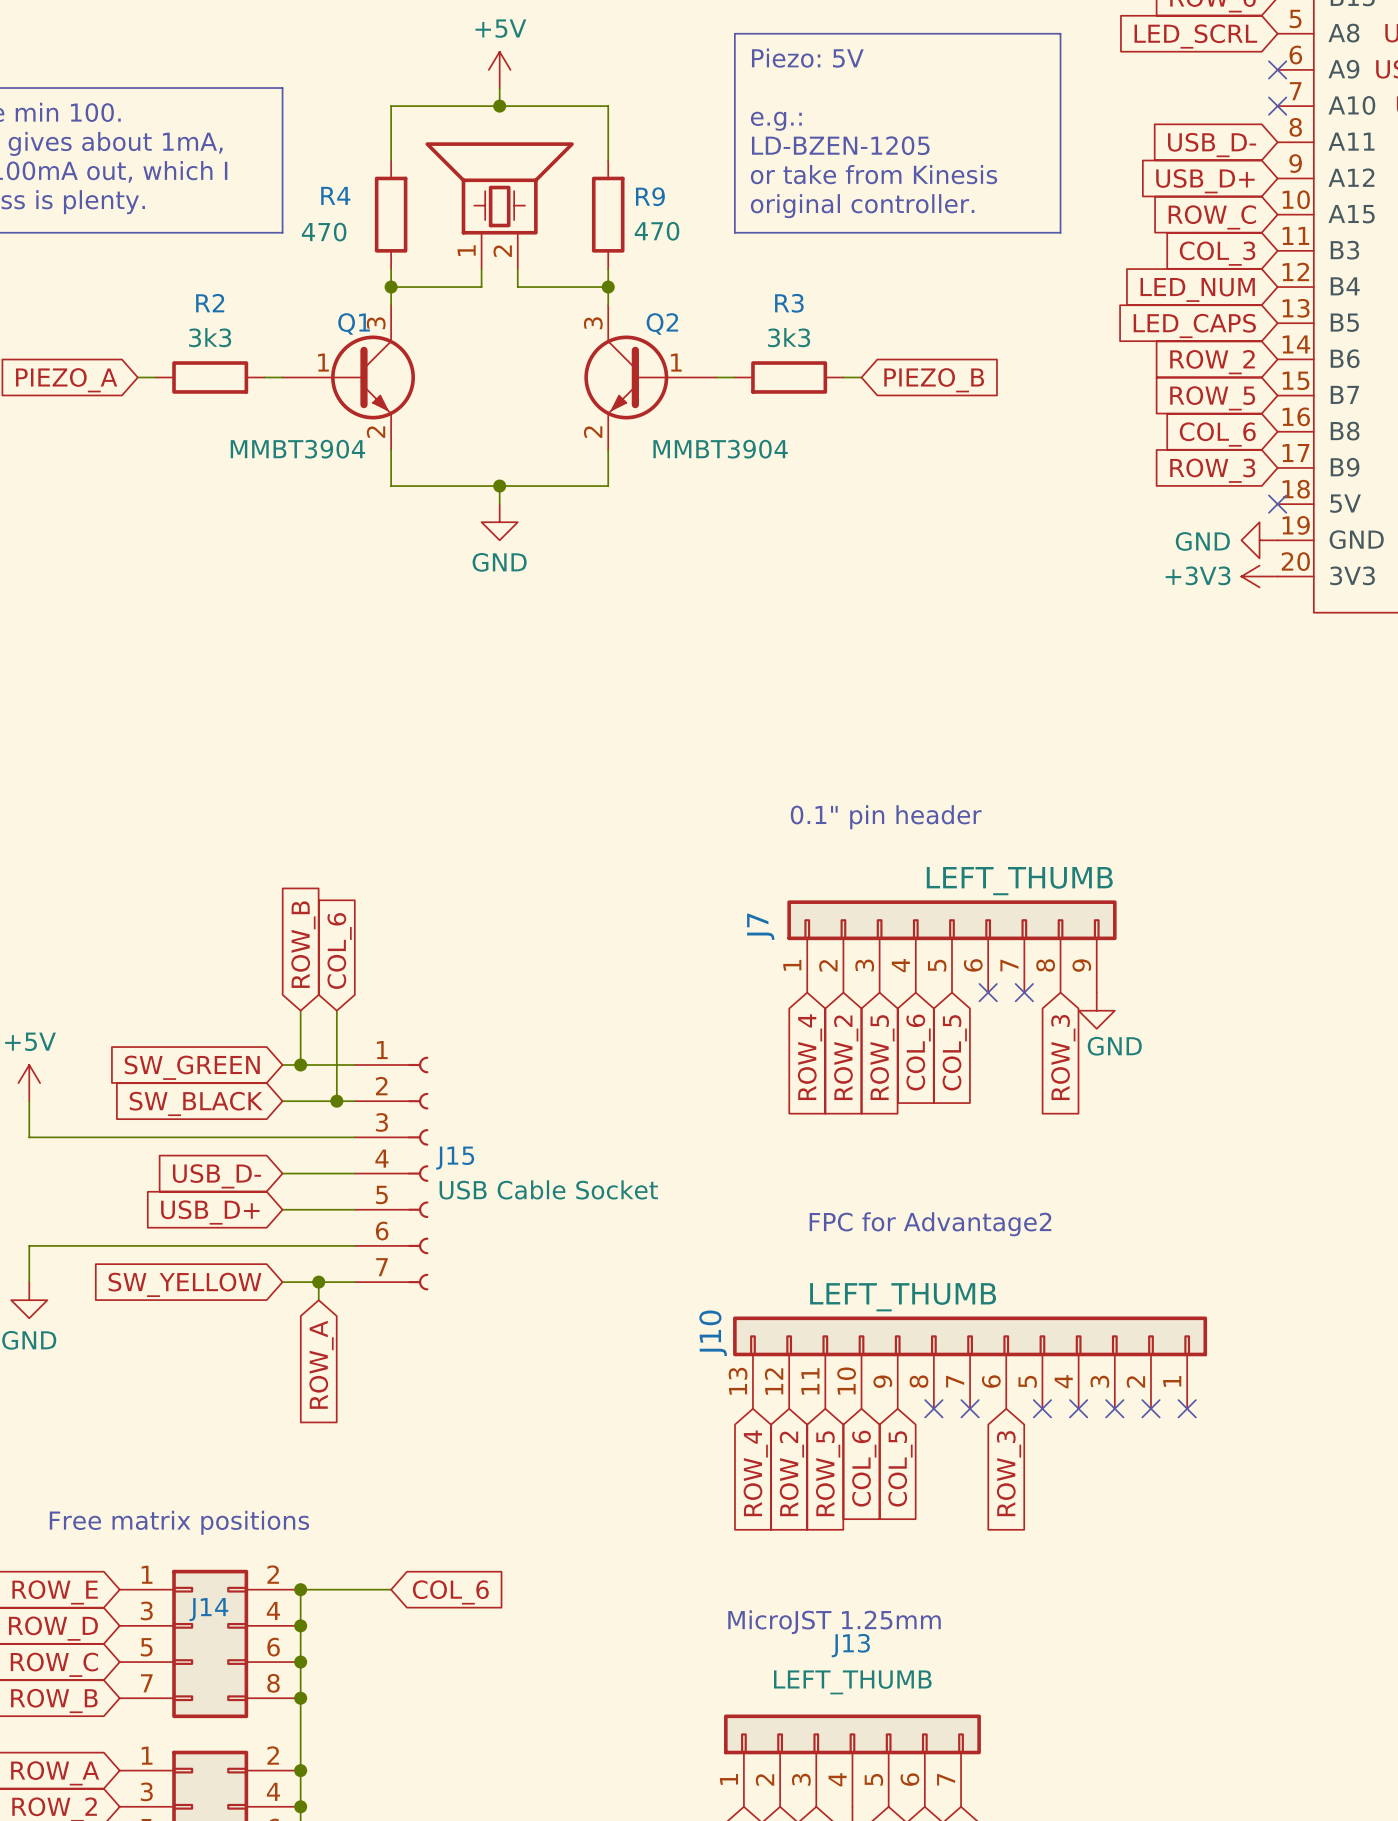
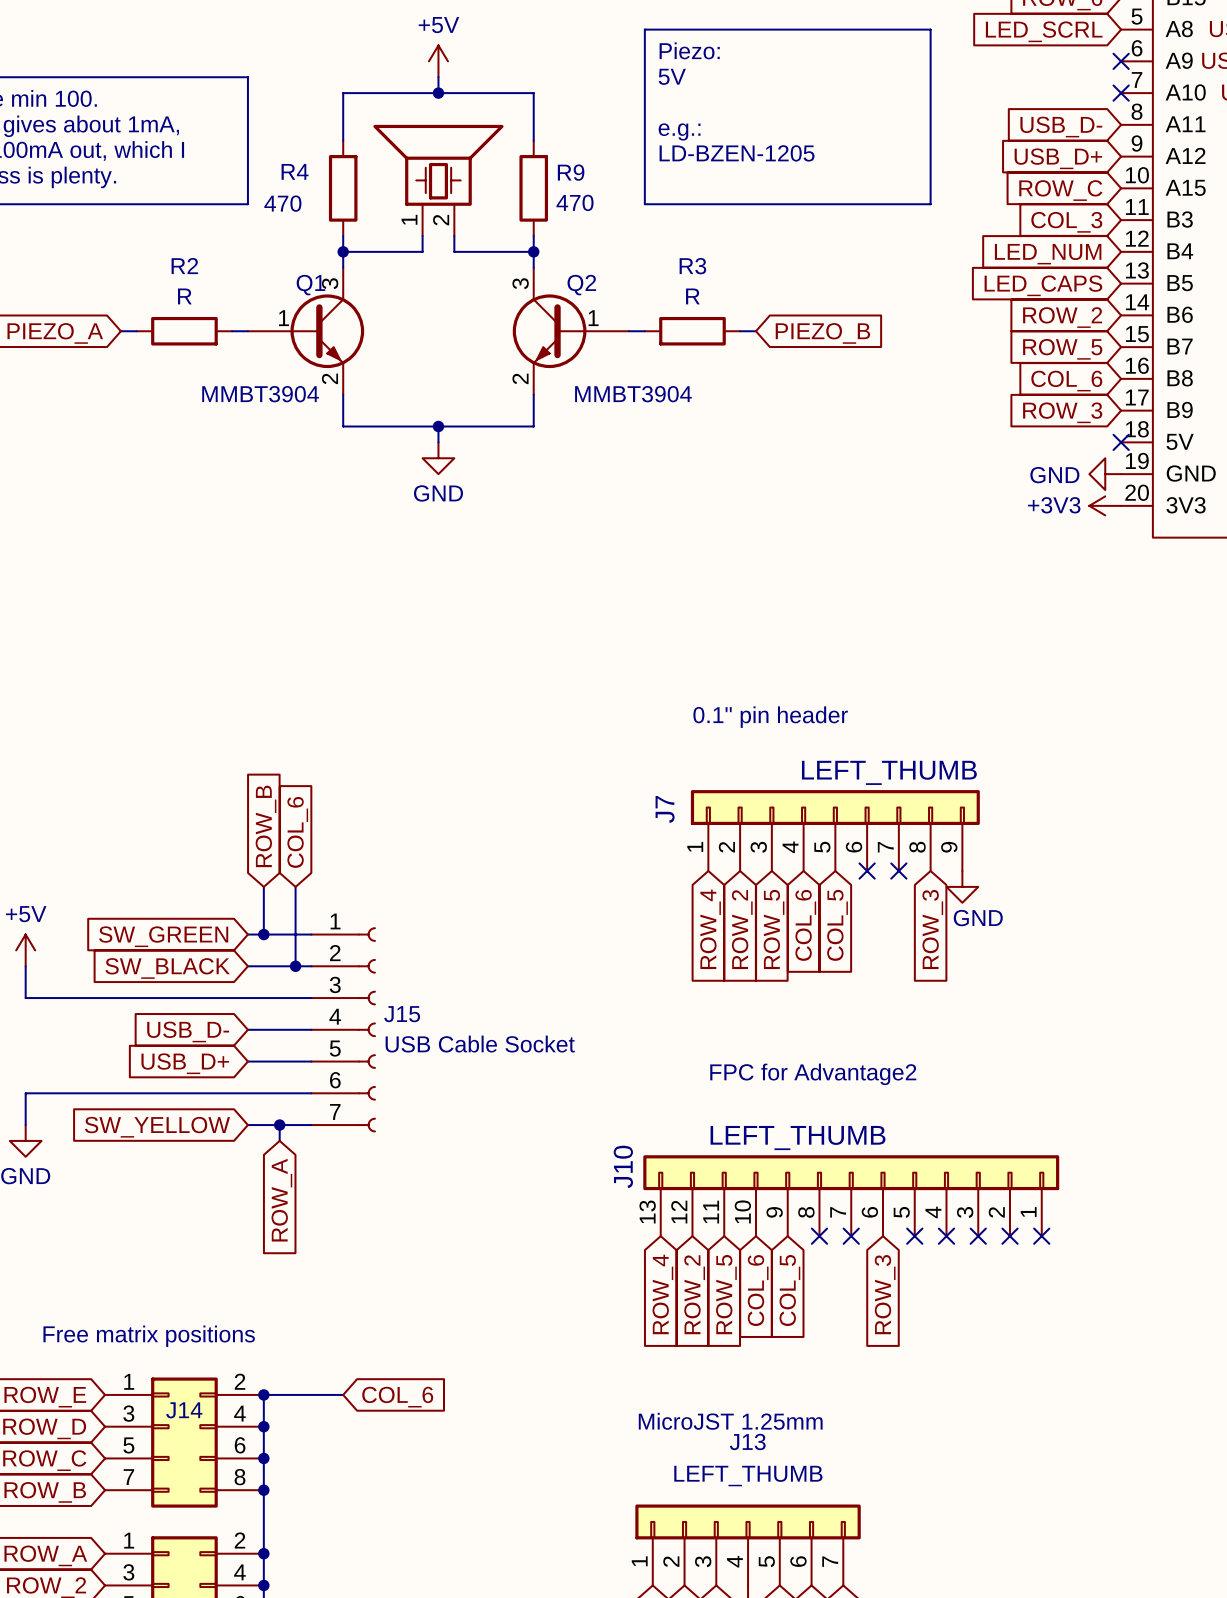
text: Piezo: 5V (807, 58) -> Piezo: (689, 50)
text: none -> 5V (672, 76)
text: e.g.: (776, 121) -> none
text: LD-BZEN-1205 (840, 145) -> e.g.: (679, 131)
text: or take from Kinesis (874, 174) -> LD-BZEN-1205 (737, 153)
text: original controller. (862, 206) -> none
R2 value: 3k3 (210, 337) -> R (184, 296)
R3 value: 3k3 (789, 337) -> R (692, 296)

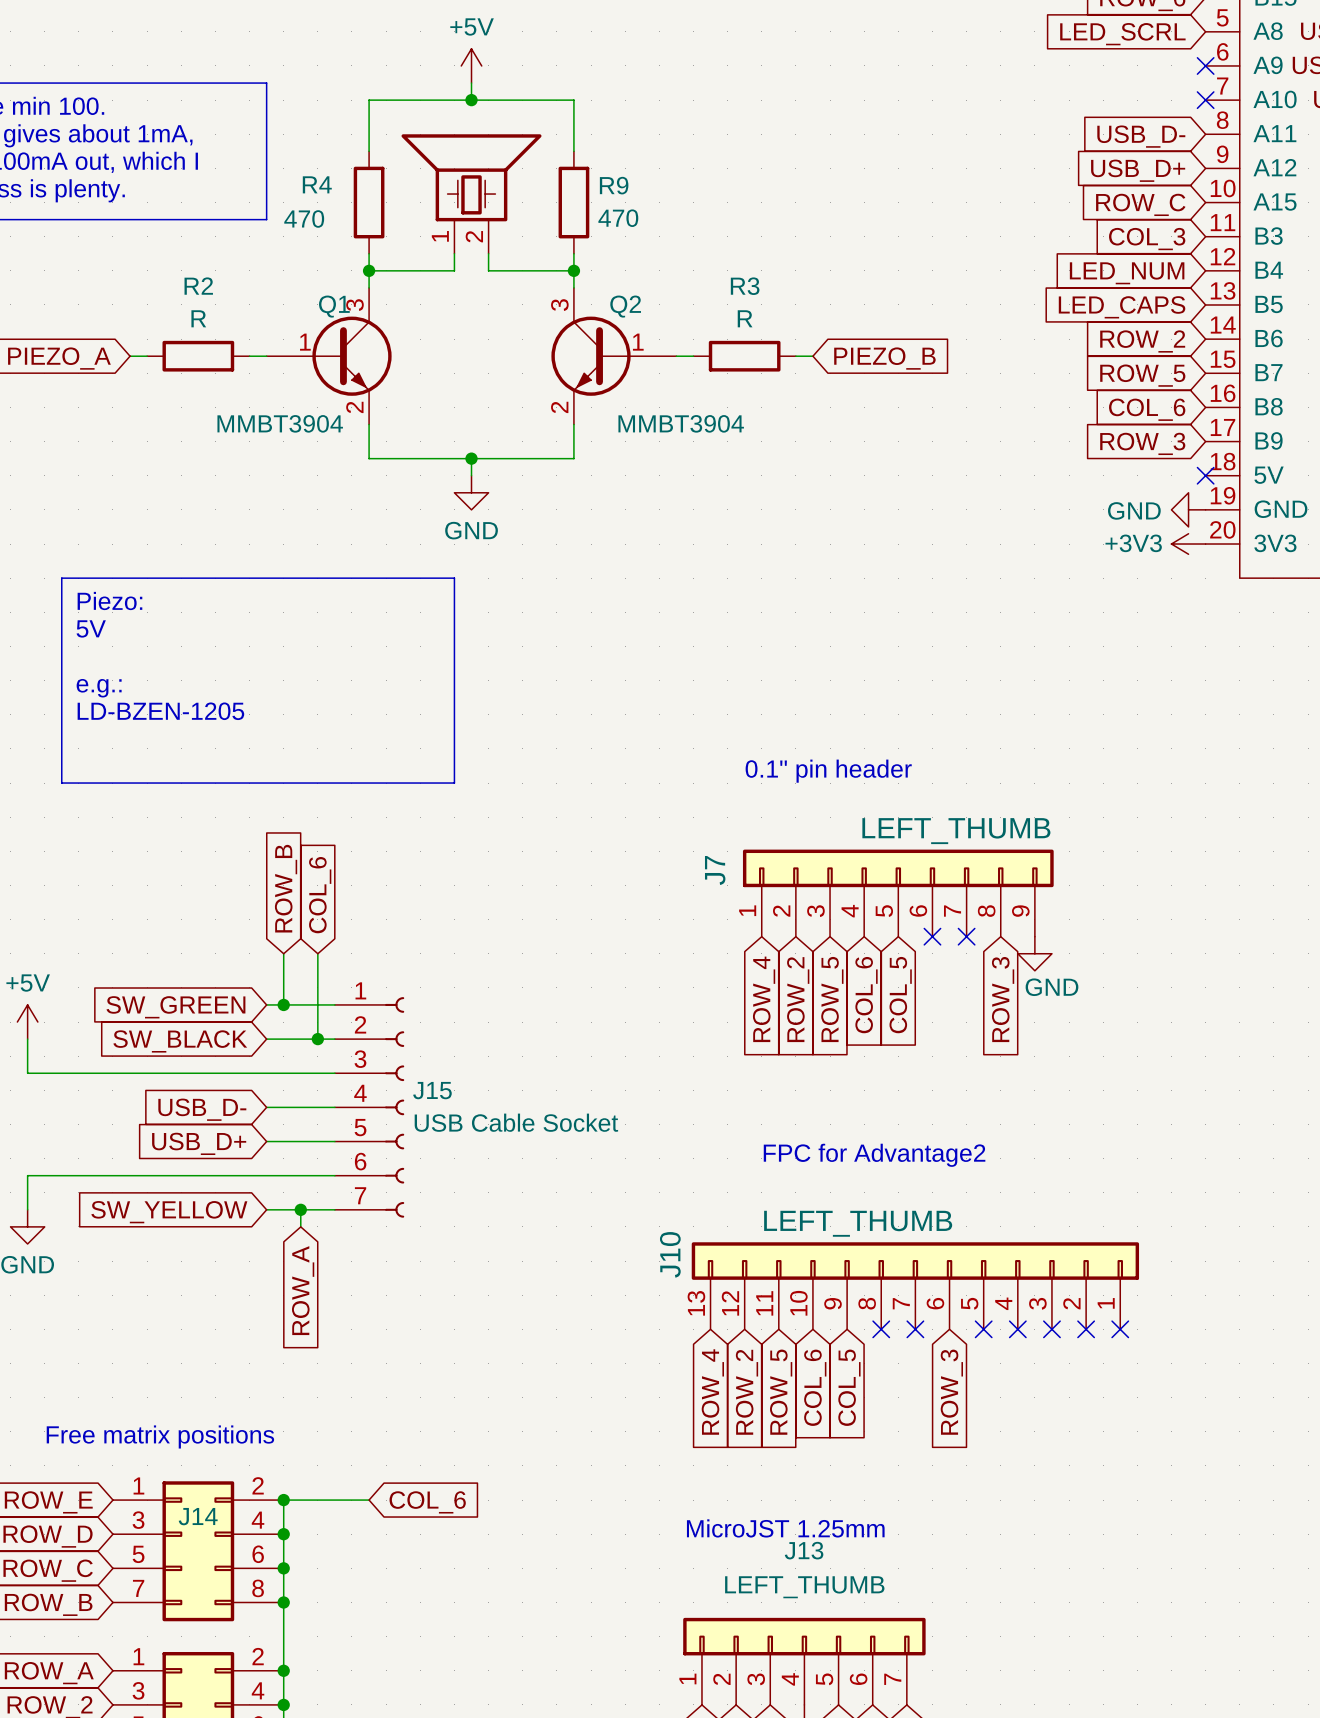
line: (644, 29) (930, 29) (930, 204) (644, 204) (644, 29) -> none
text: Piezo: (689, 50) -> none
text: 5V (672, 76) -> none
text: e.g.: (679, 131) -> none
text: LD-BZEN-1205 (737, 153) -> none
line: none -> (61, 578) (454, 578) (454, 783) (61, 783) (61, 578)
text: none -> Piezo: (109, 600)
text: none -> 5V (91, 628)
text: none -> e.g.: (99, 688)
text: none -> LD-BZEN-1205 (160, 711)

